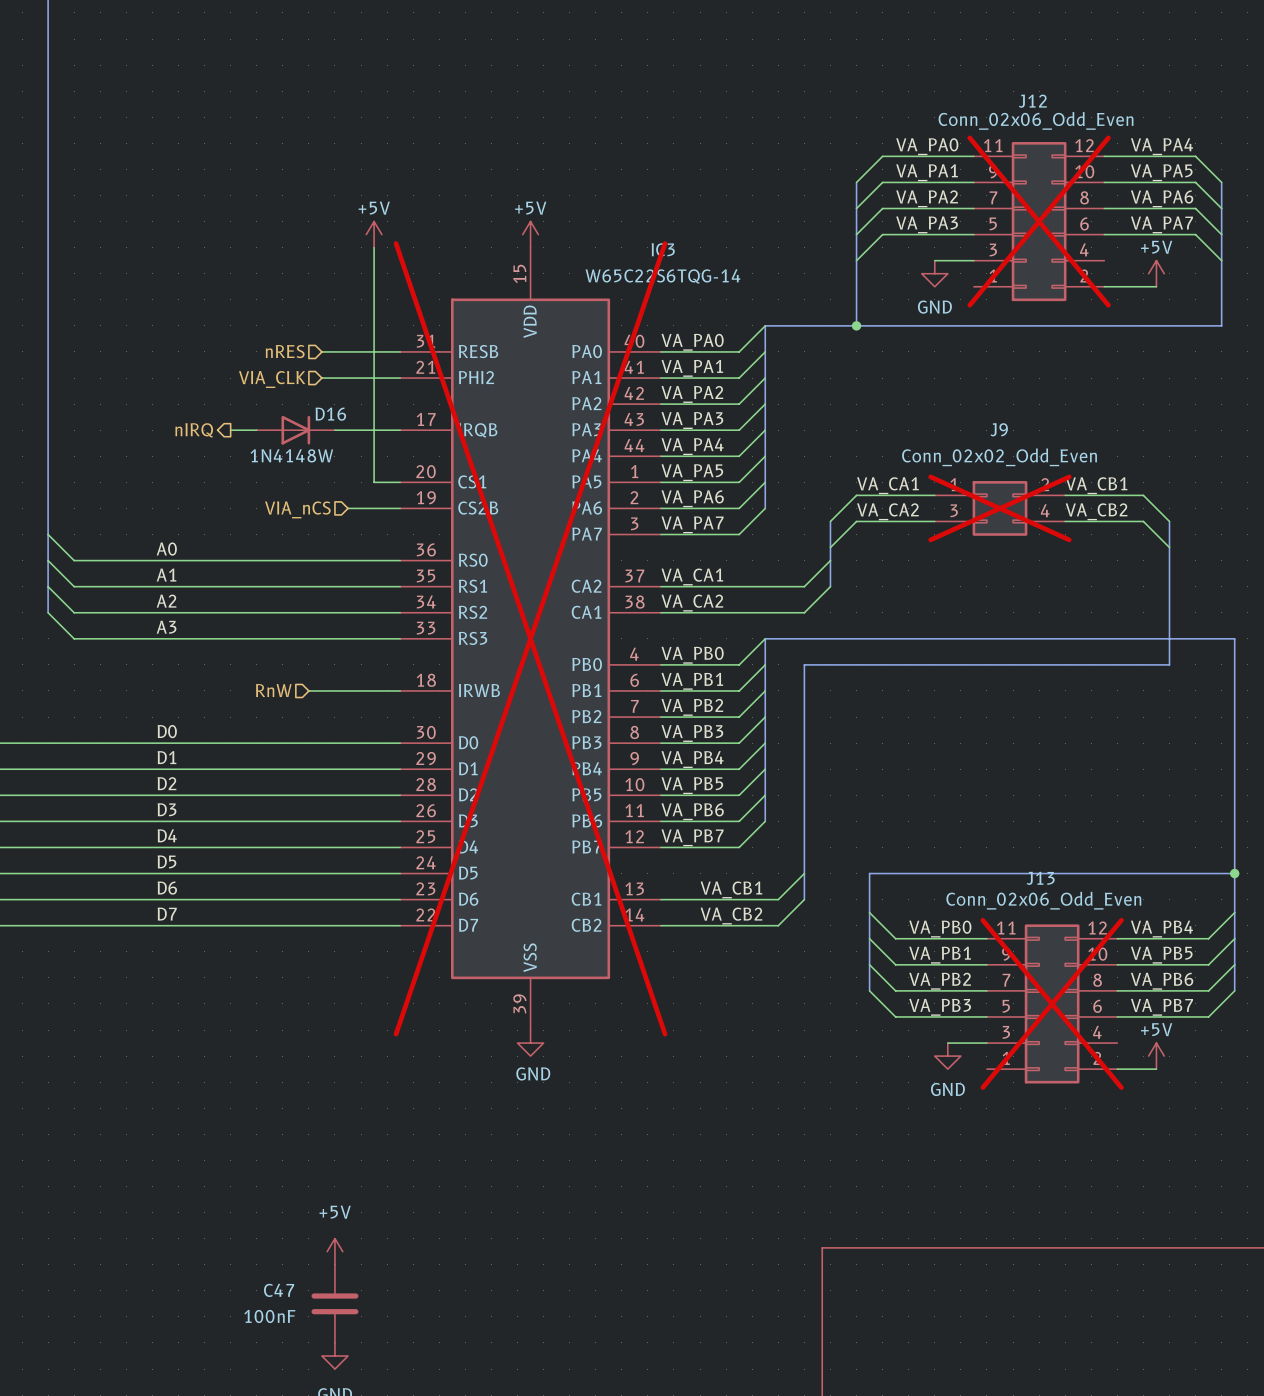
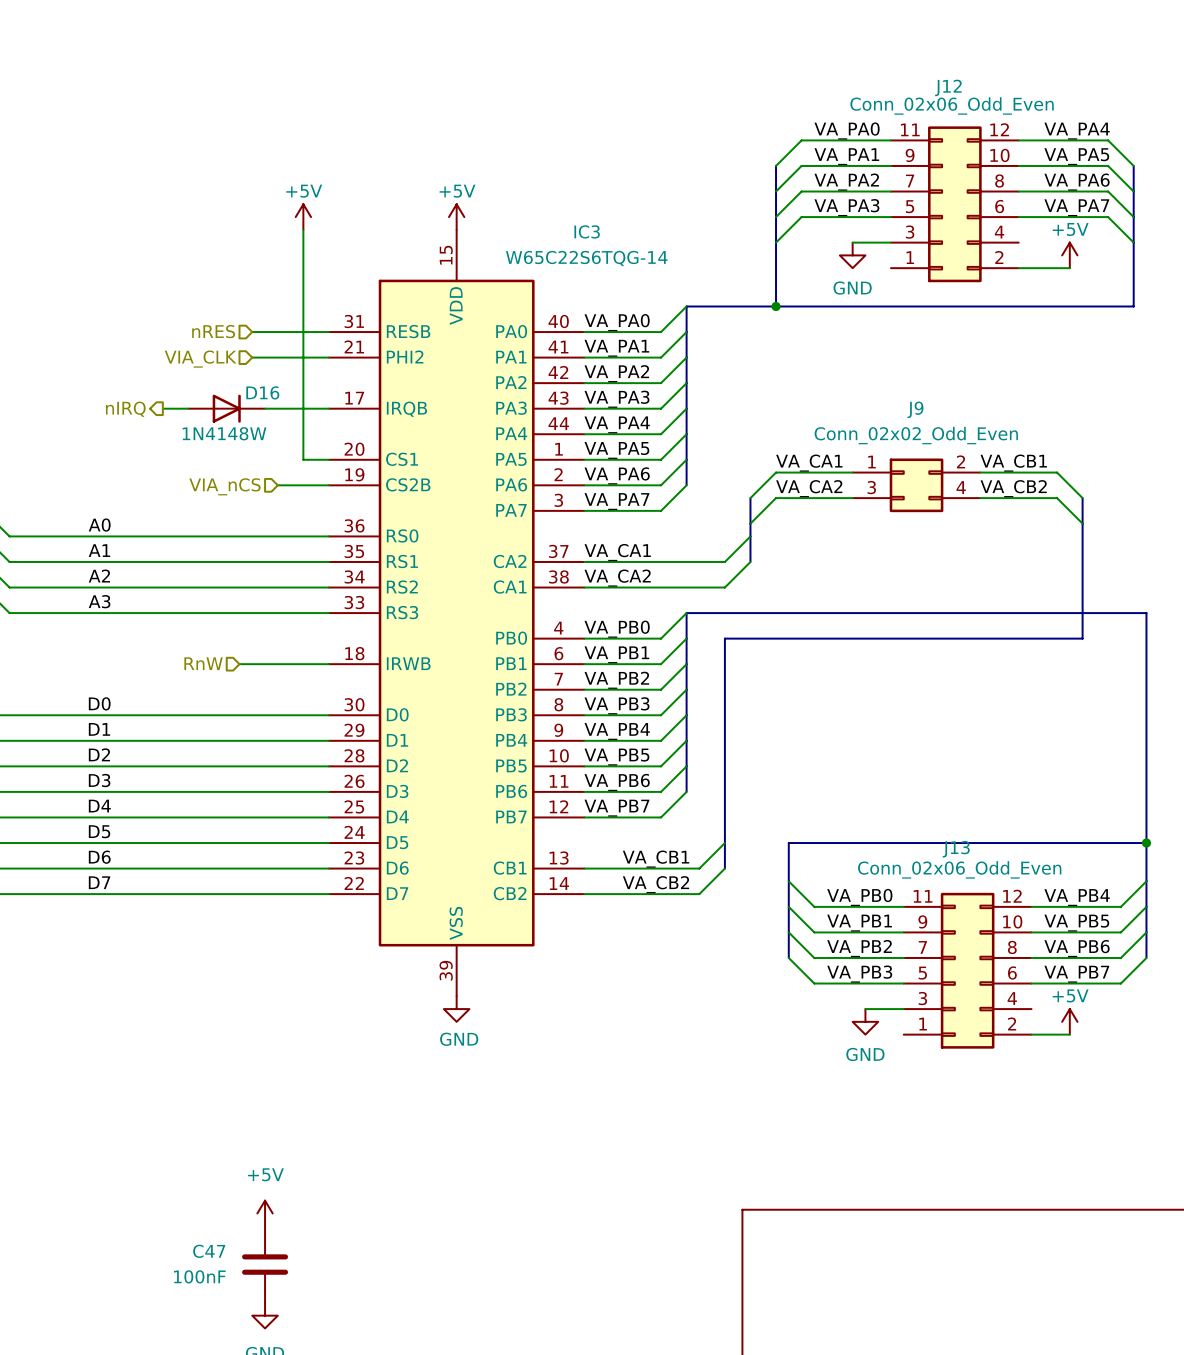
J12 do-not-place cross: (1039, 221) -> none
J9 do-not-place cross: (999, 508) -> none
IC3 do-not-place cross: (530, 638) -> none
J13 do-not-place cross: (1052, 1003) -> none

